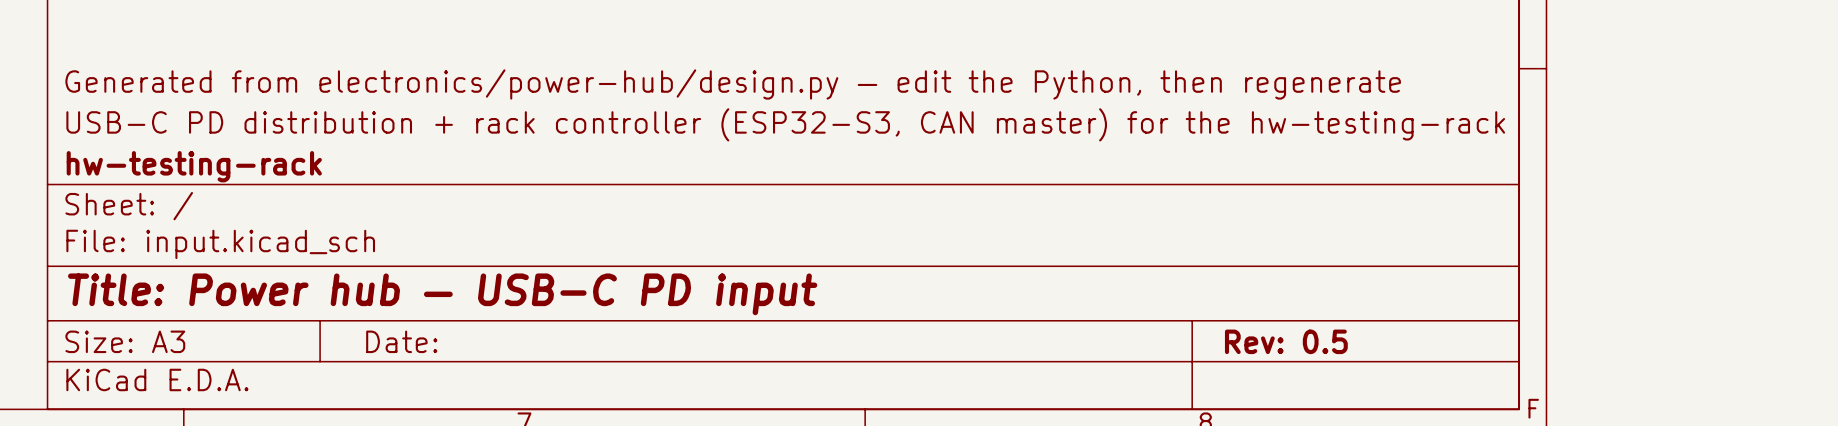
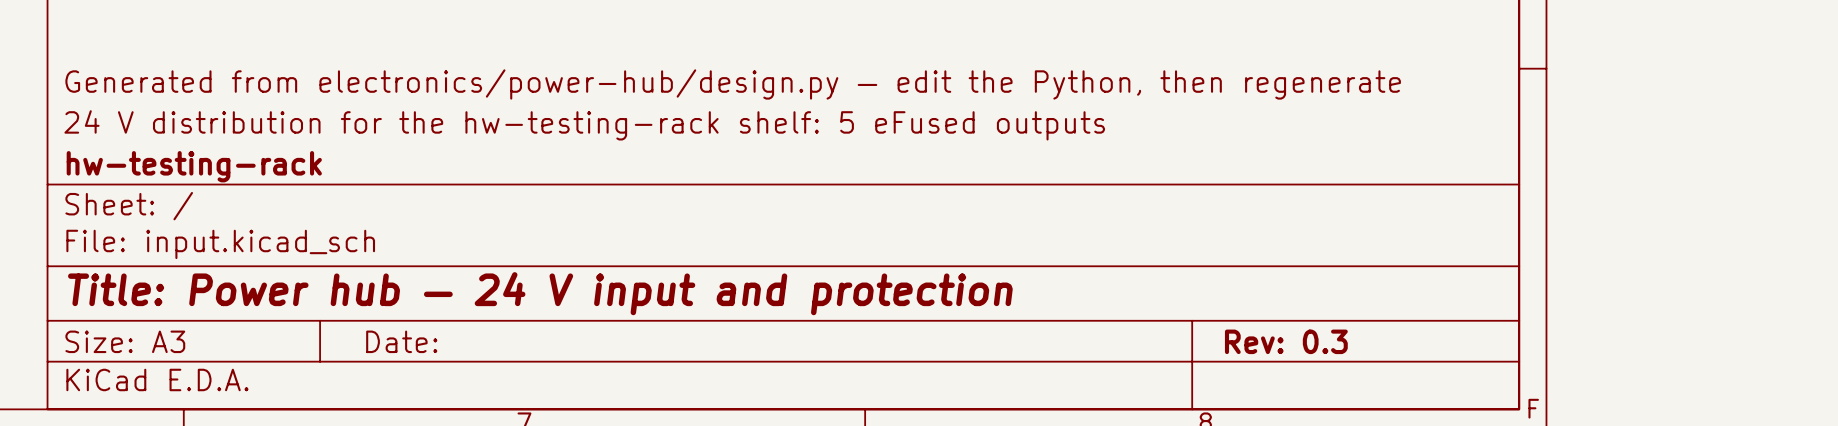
title block: USB-C PD distribution + rack controller (ESP32-S3, CAN master) for the hw-testing-rack (785, 124) -> 24 V distribution for the hw-testing-rack shelf: 5 eFused outputs (584, 125)
title block: Title: Power hub — USB-C PD input (442, 294) -> Title: Power hub — 24 V input and protection (540, 293)
title block: Rev: 0.5 (1286, 341) -> Rev: 0.3 (1286, 341)

